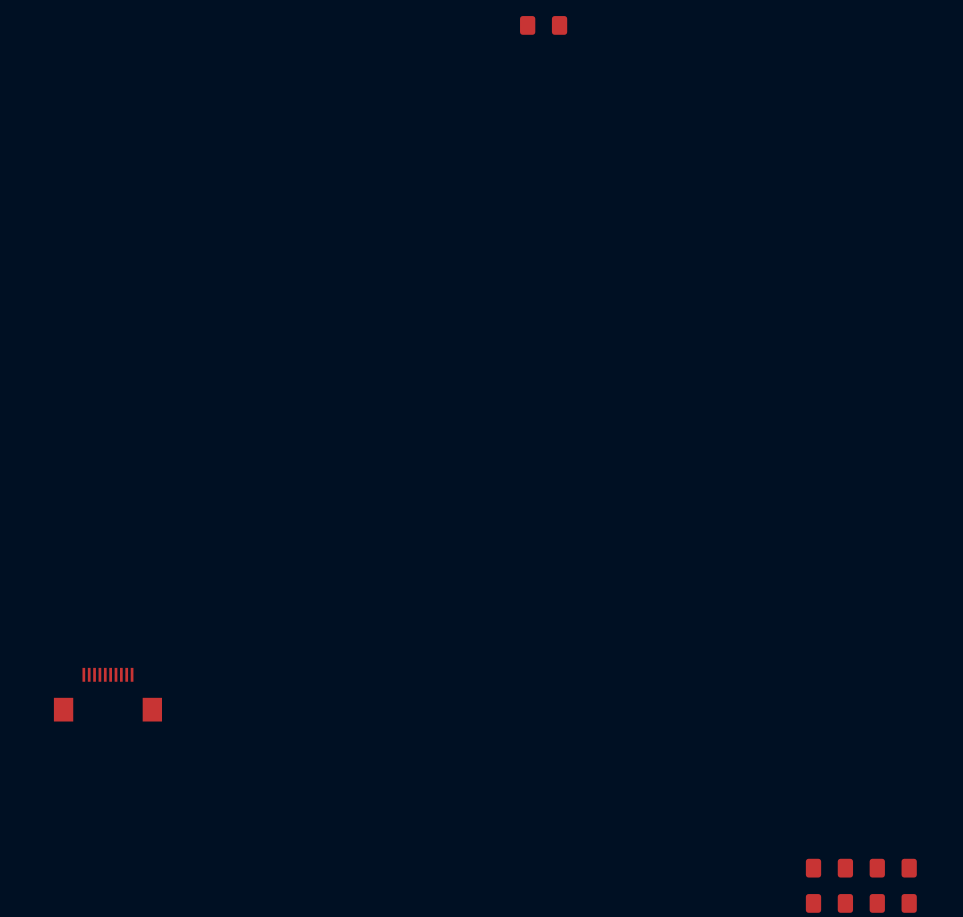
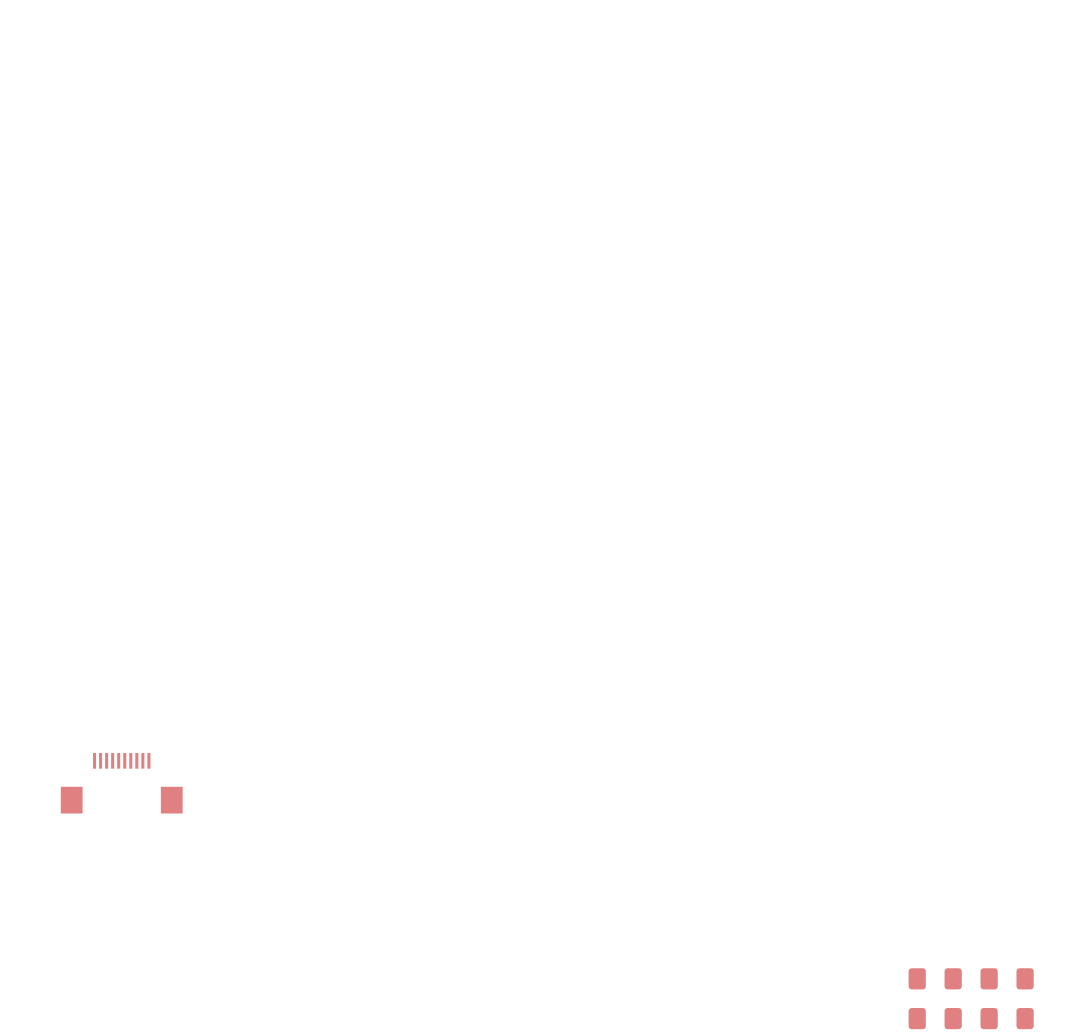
part: (543, 25) -> none

